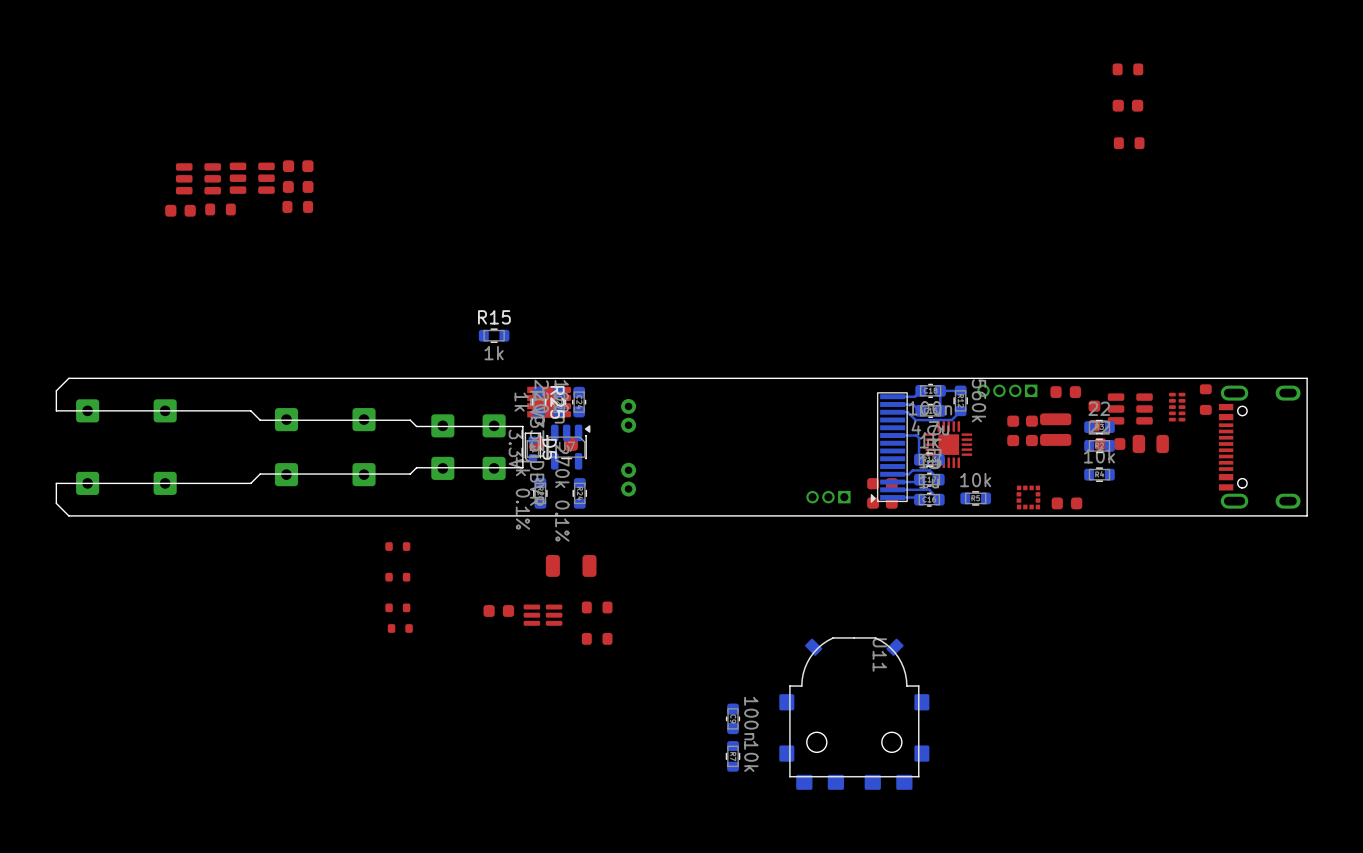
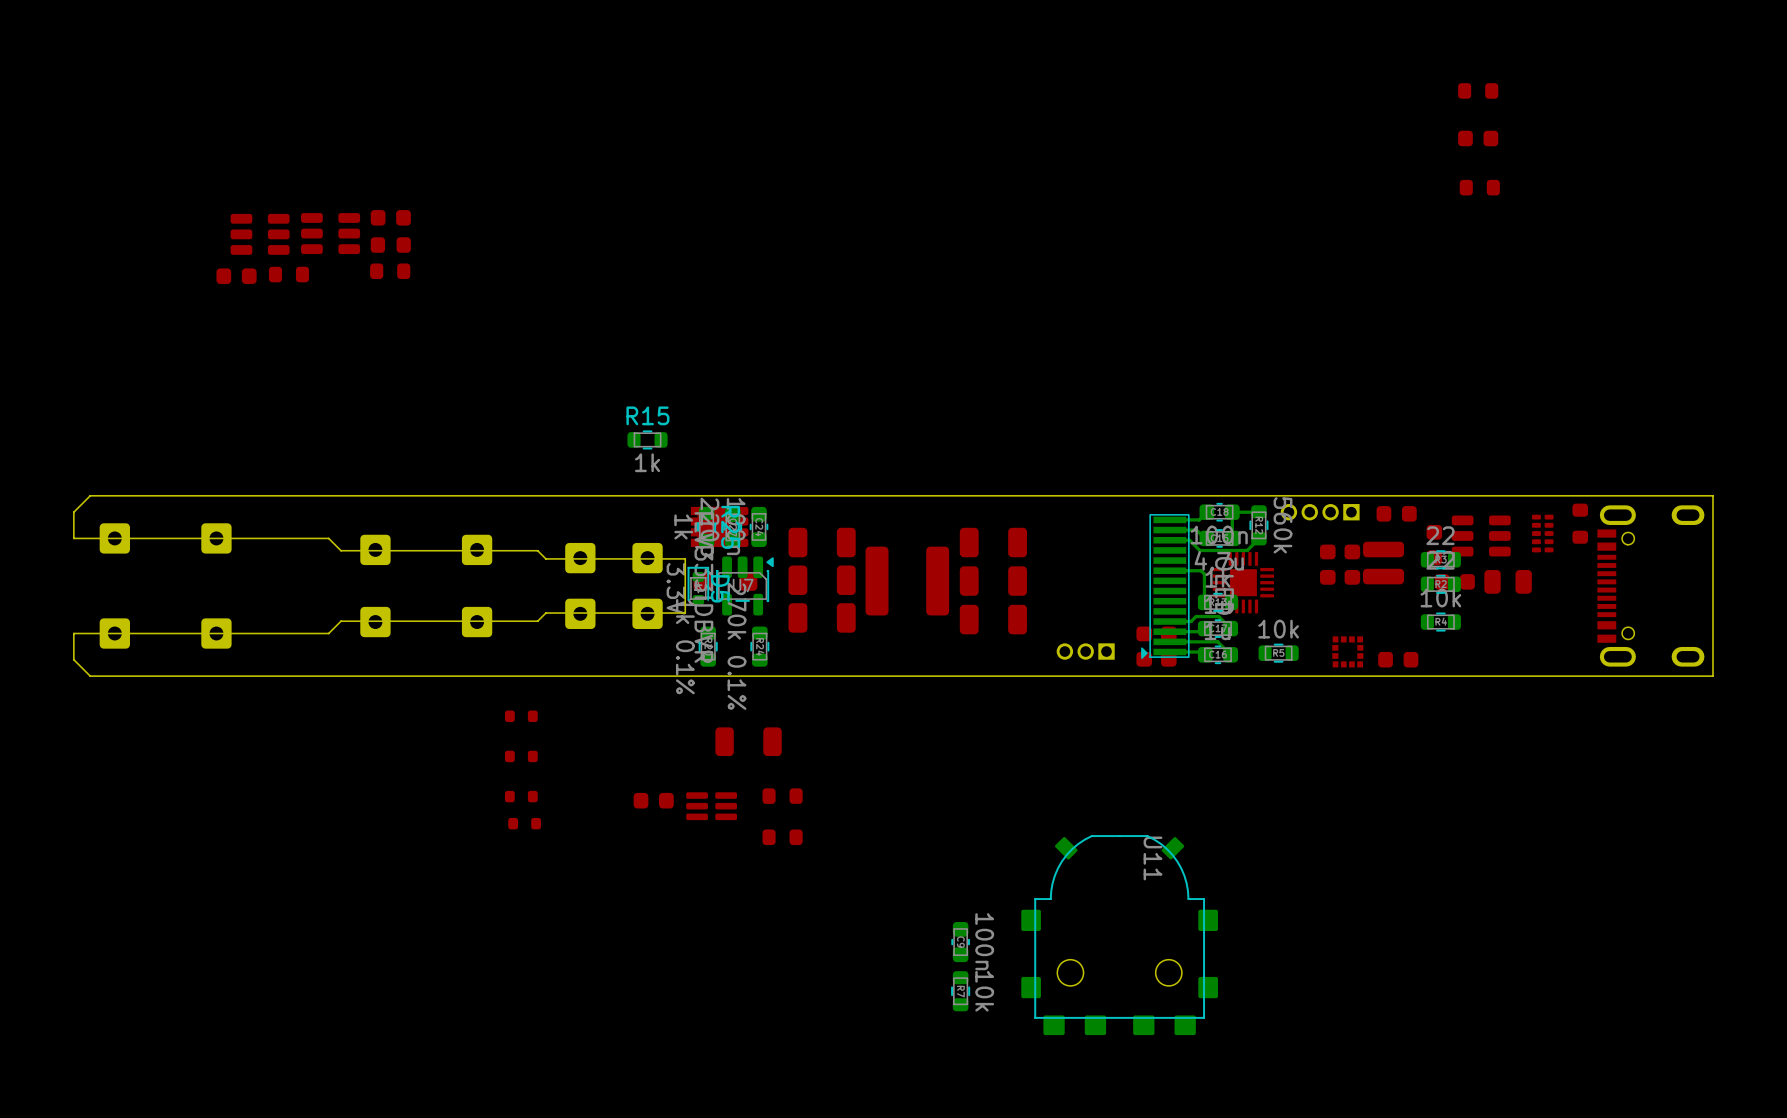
part footprint: [621, 398, 637, 433] -> [788, 527, 856, 558]
part: none -> (993, 542)
part: none -> (822, 580)
part: none -> (907, 581)
part: none -> (993, 581)
part footprint: [621, 462, 637, 497] -> [788, 603, 856, 633]
part: none -> (993, 619)

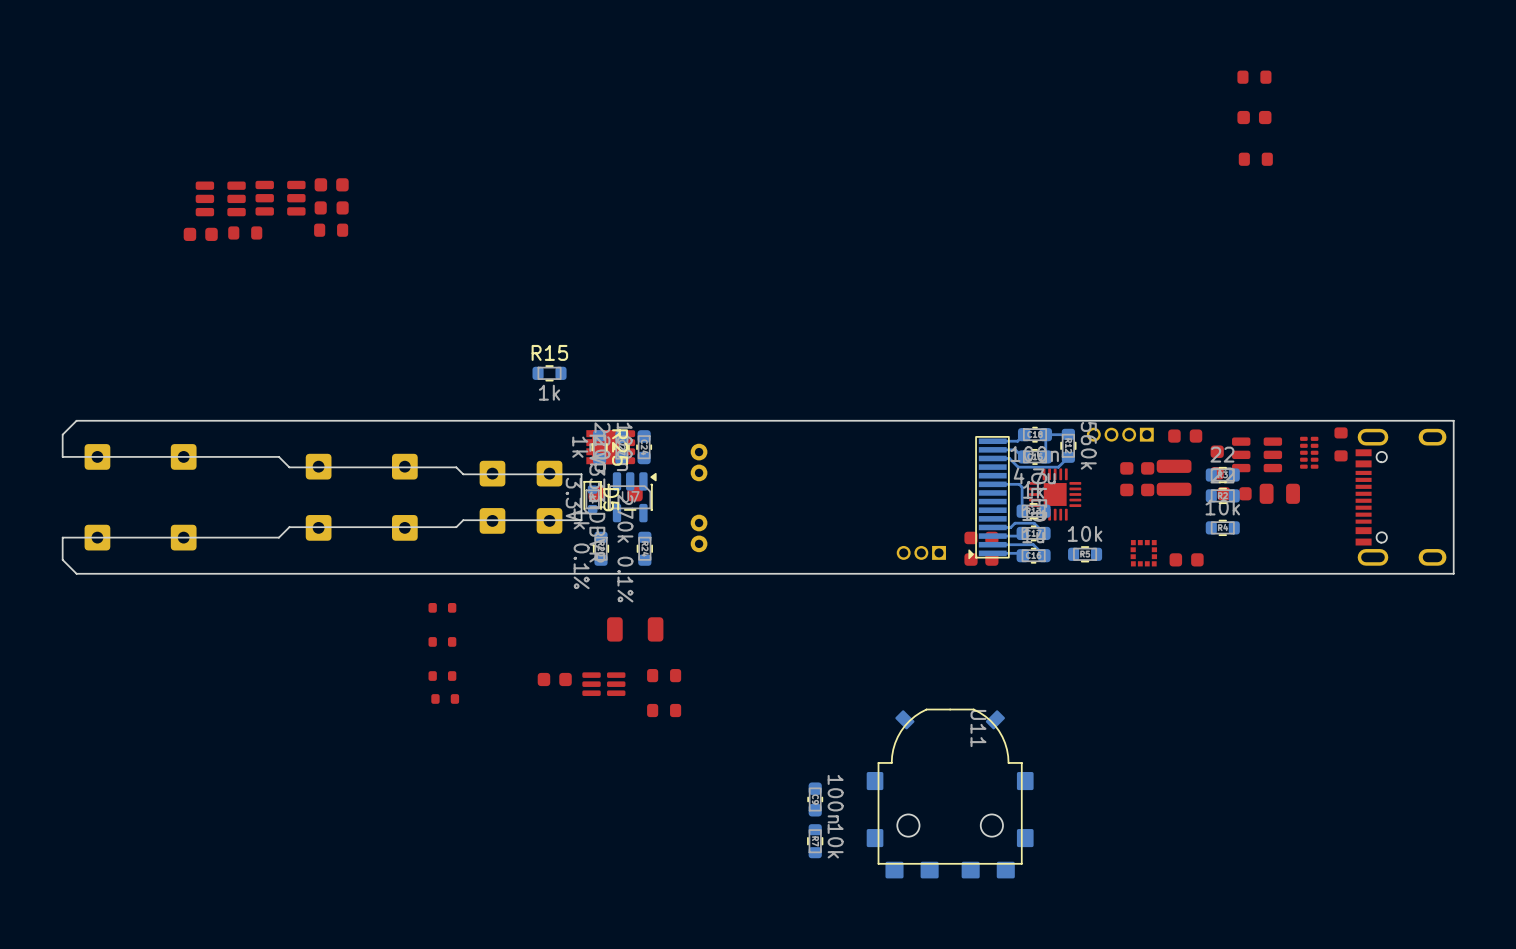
part footprint: [788, 527, 856, 558] -> [690, 443, 708, 482]
part: (993, 542) -> none
part: (822, 580) -> none
part: (907, 581) -> none
part: (993, 581) -> none
part footprint: [788, 603, 856, 633] -> [690, 514, 708, 553]
part: (993, 619) -> none

